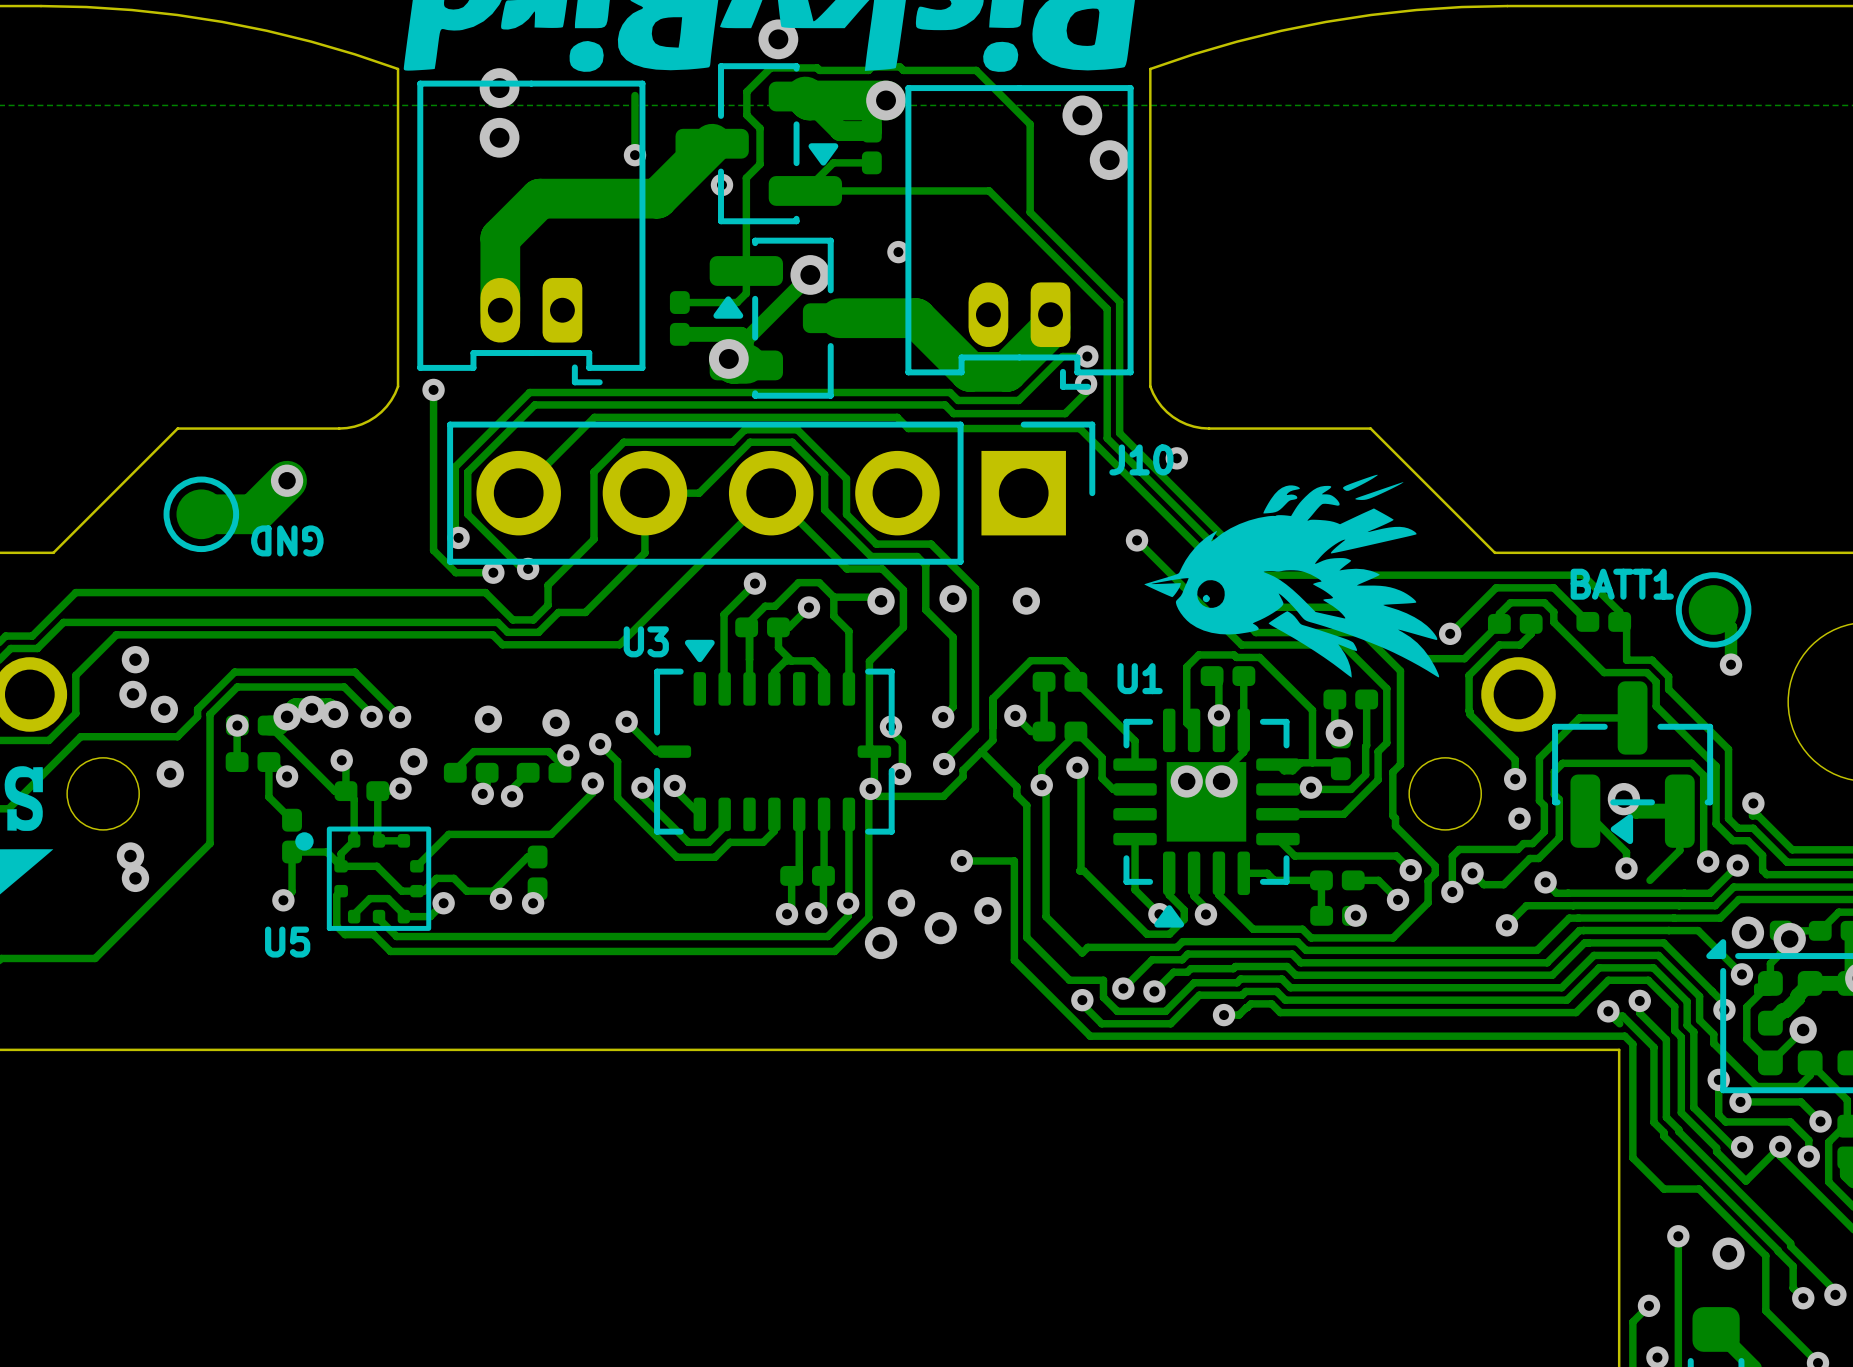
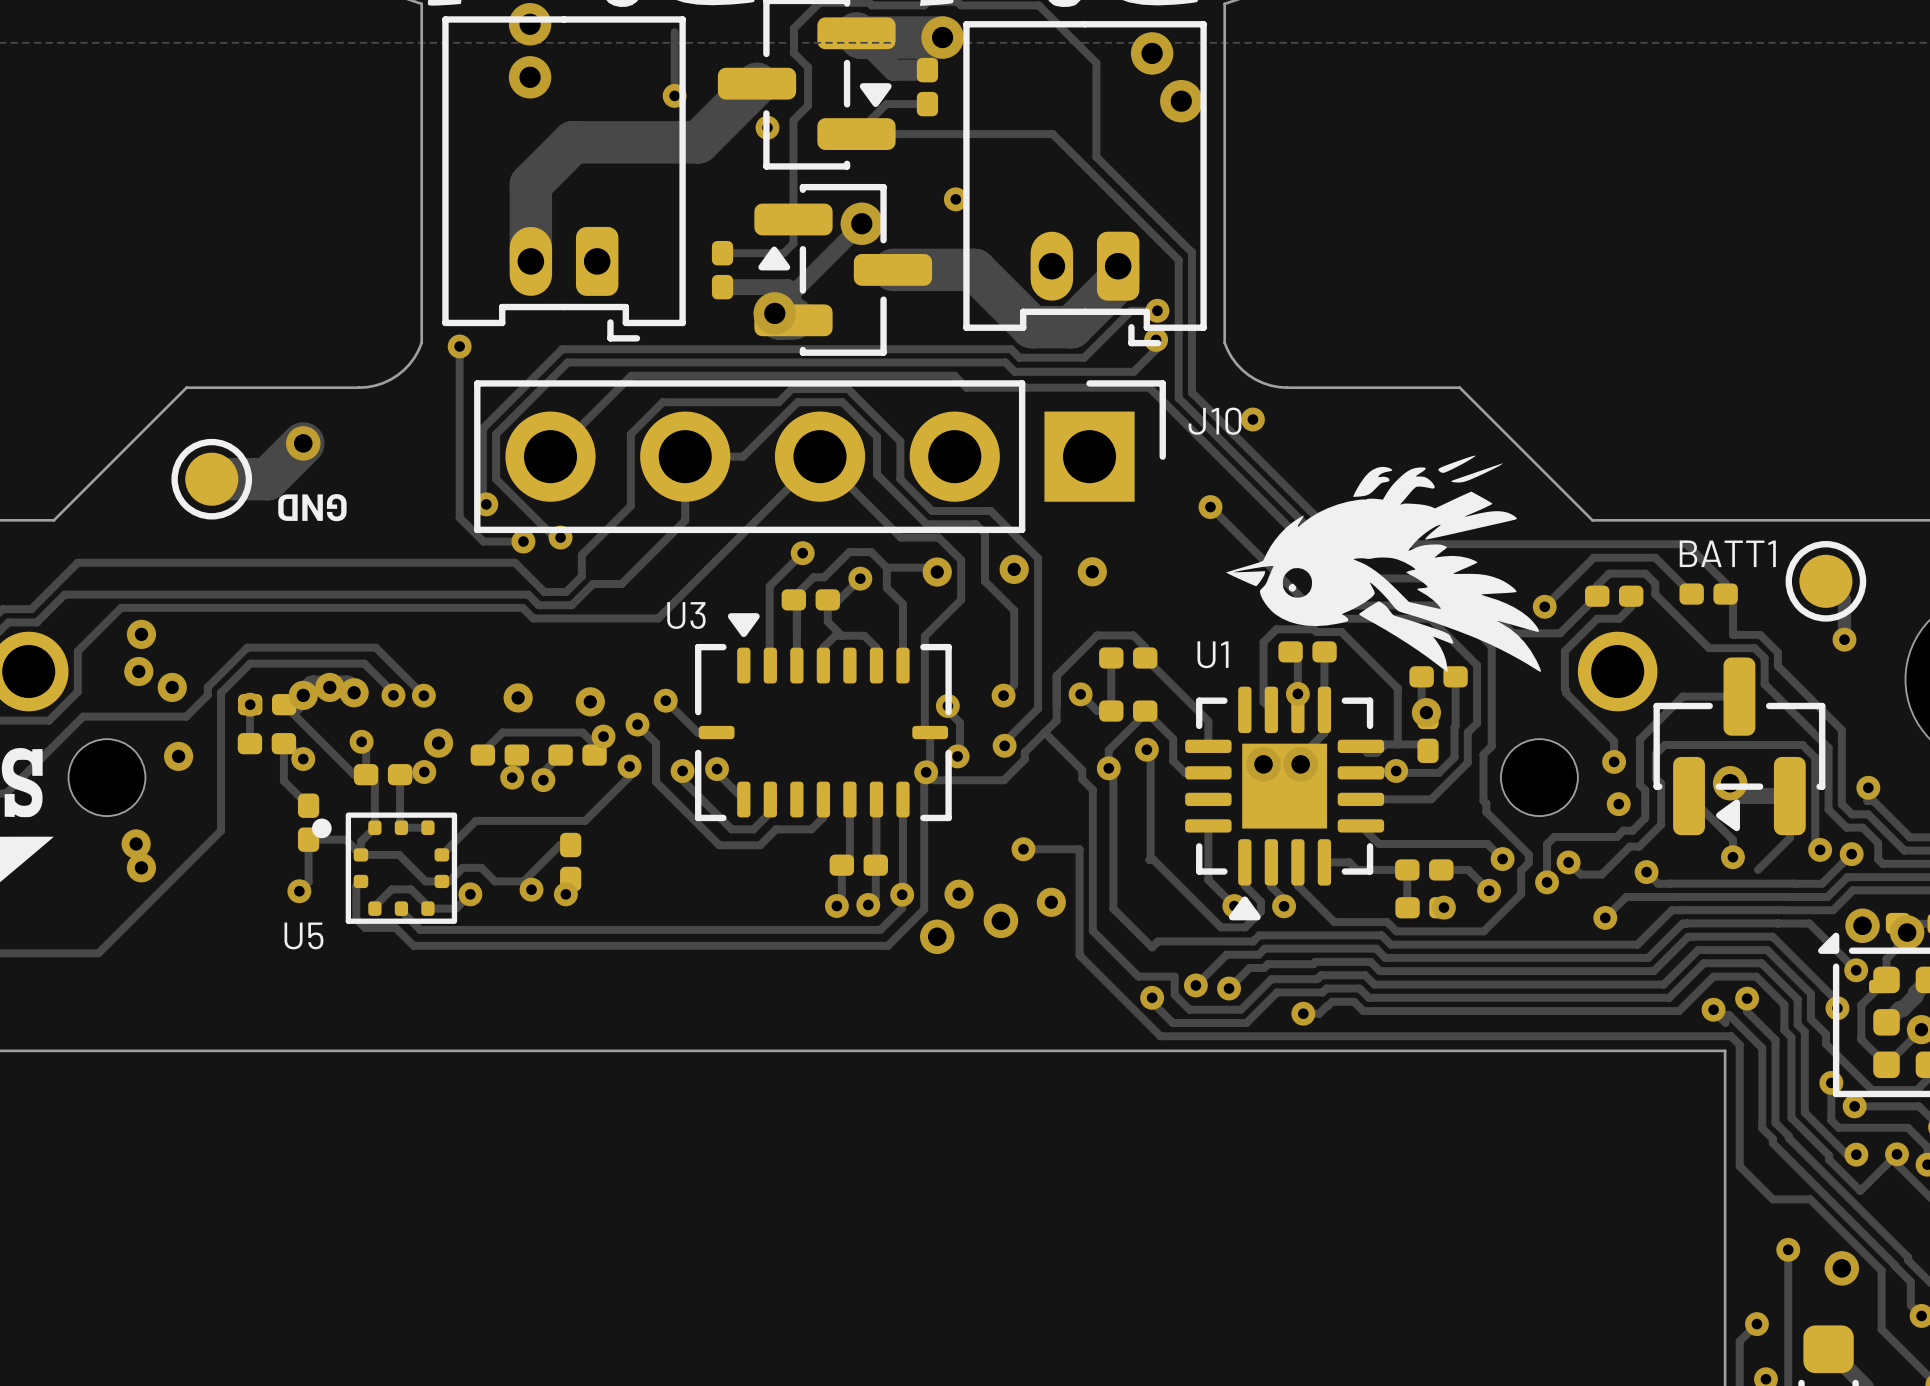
drawing position: (1291, 576) -> (1383, 563)

